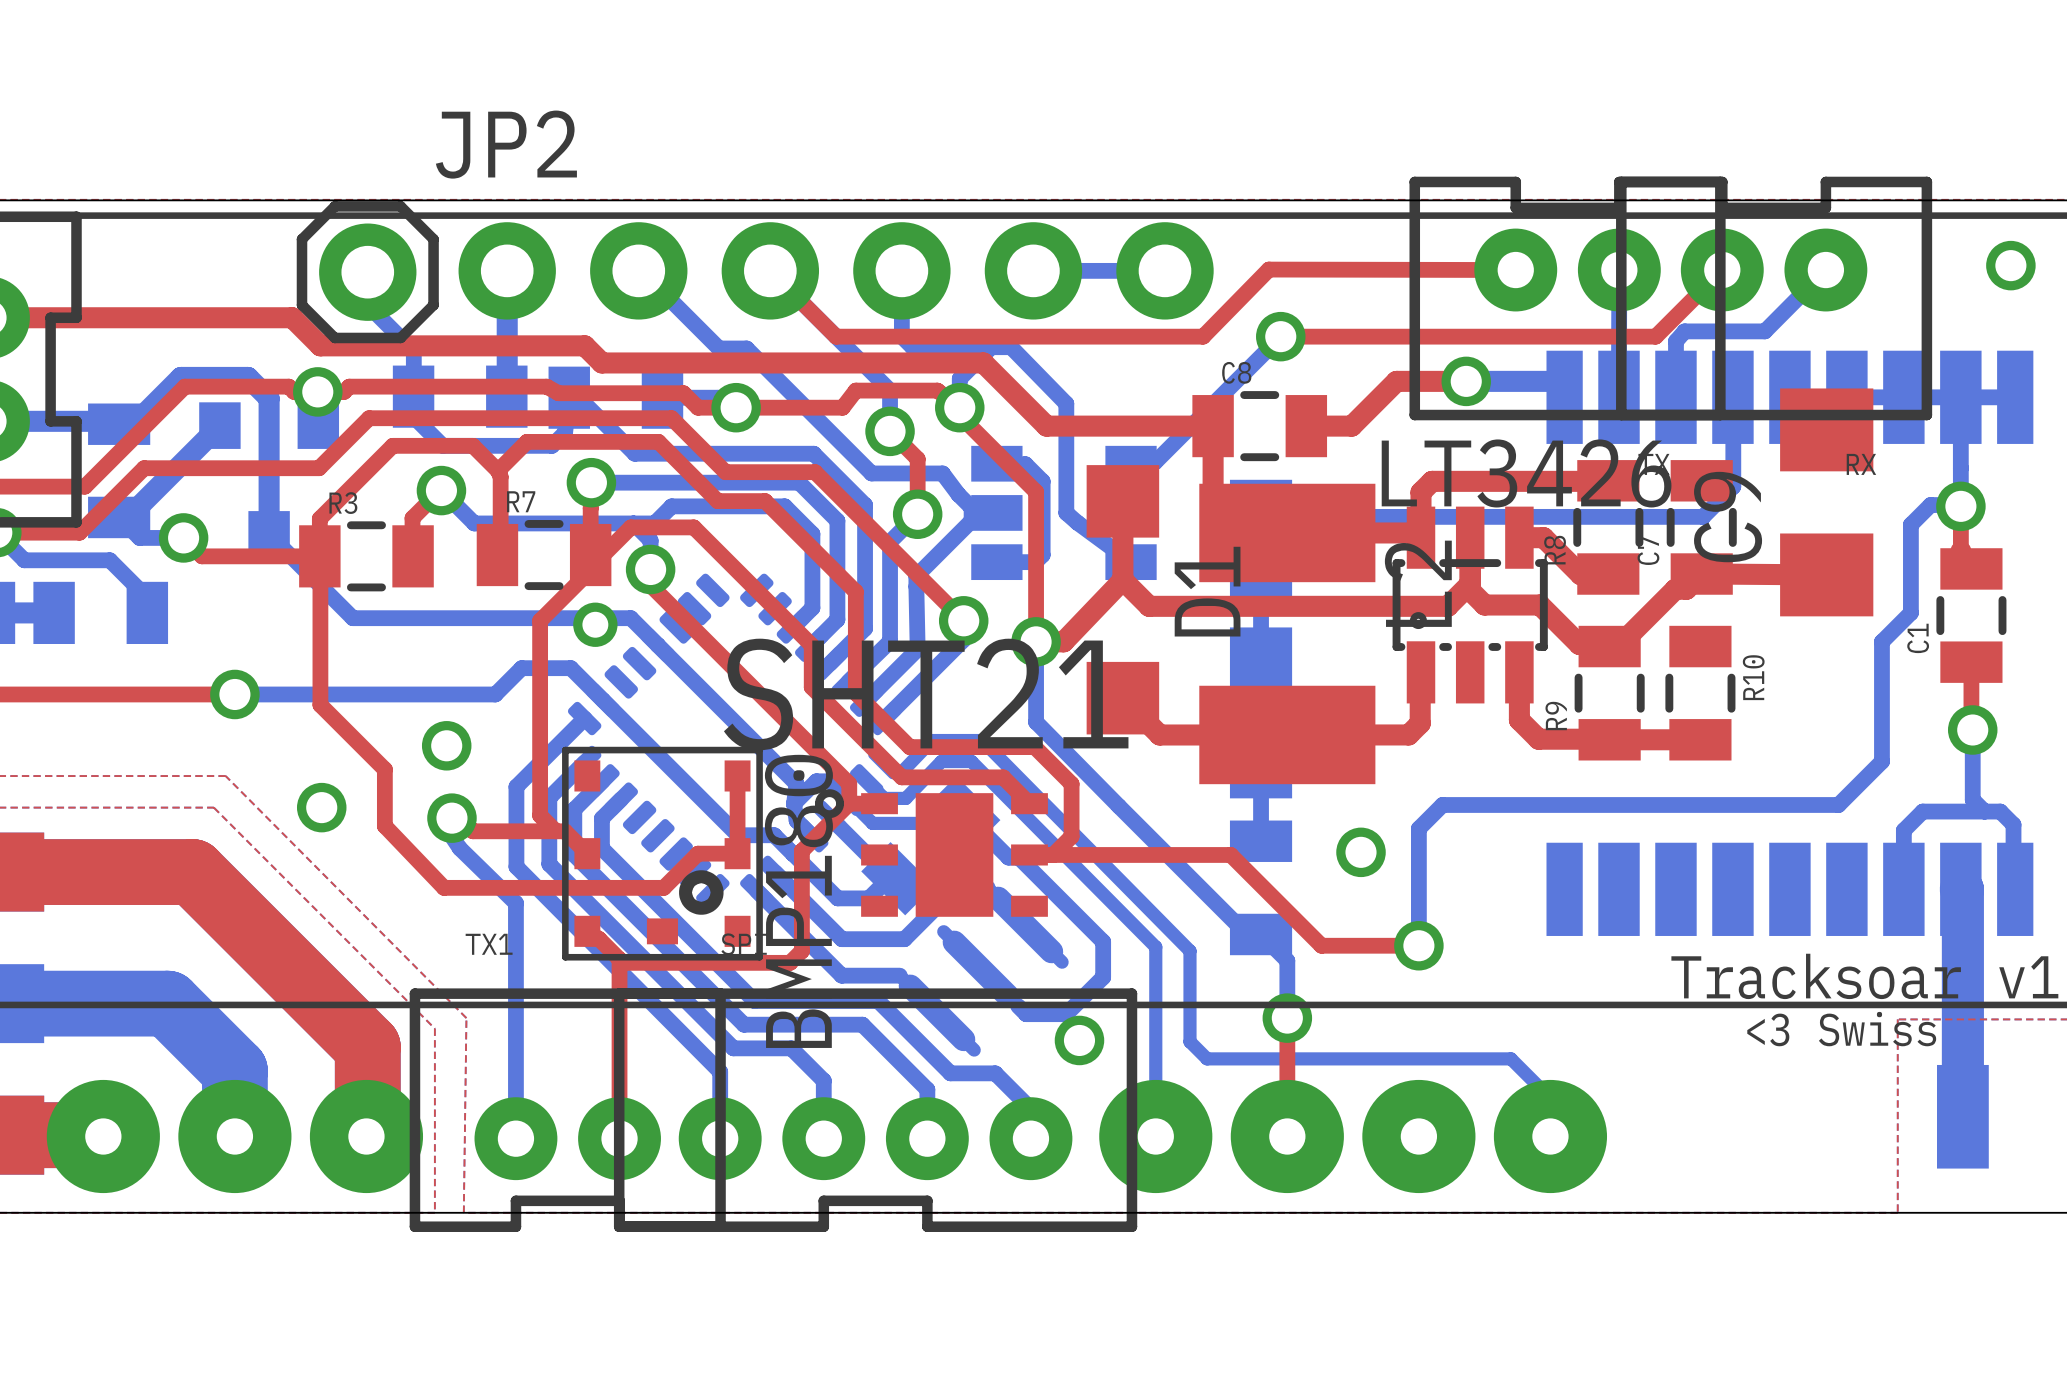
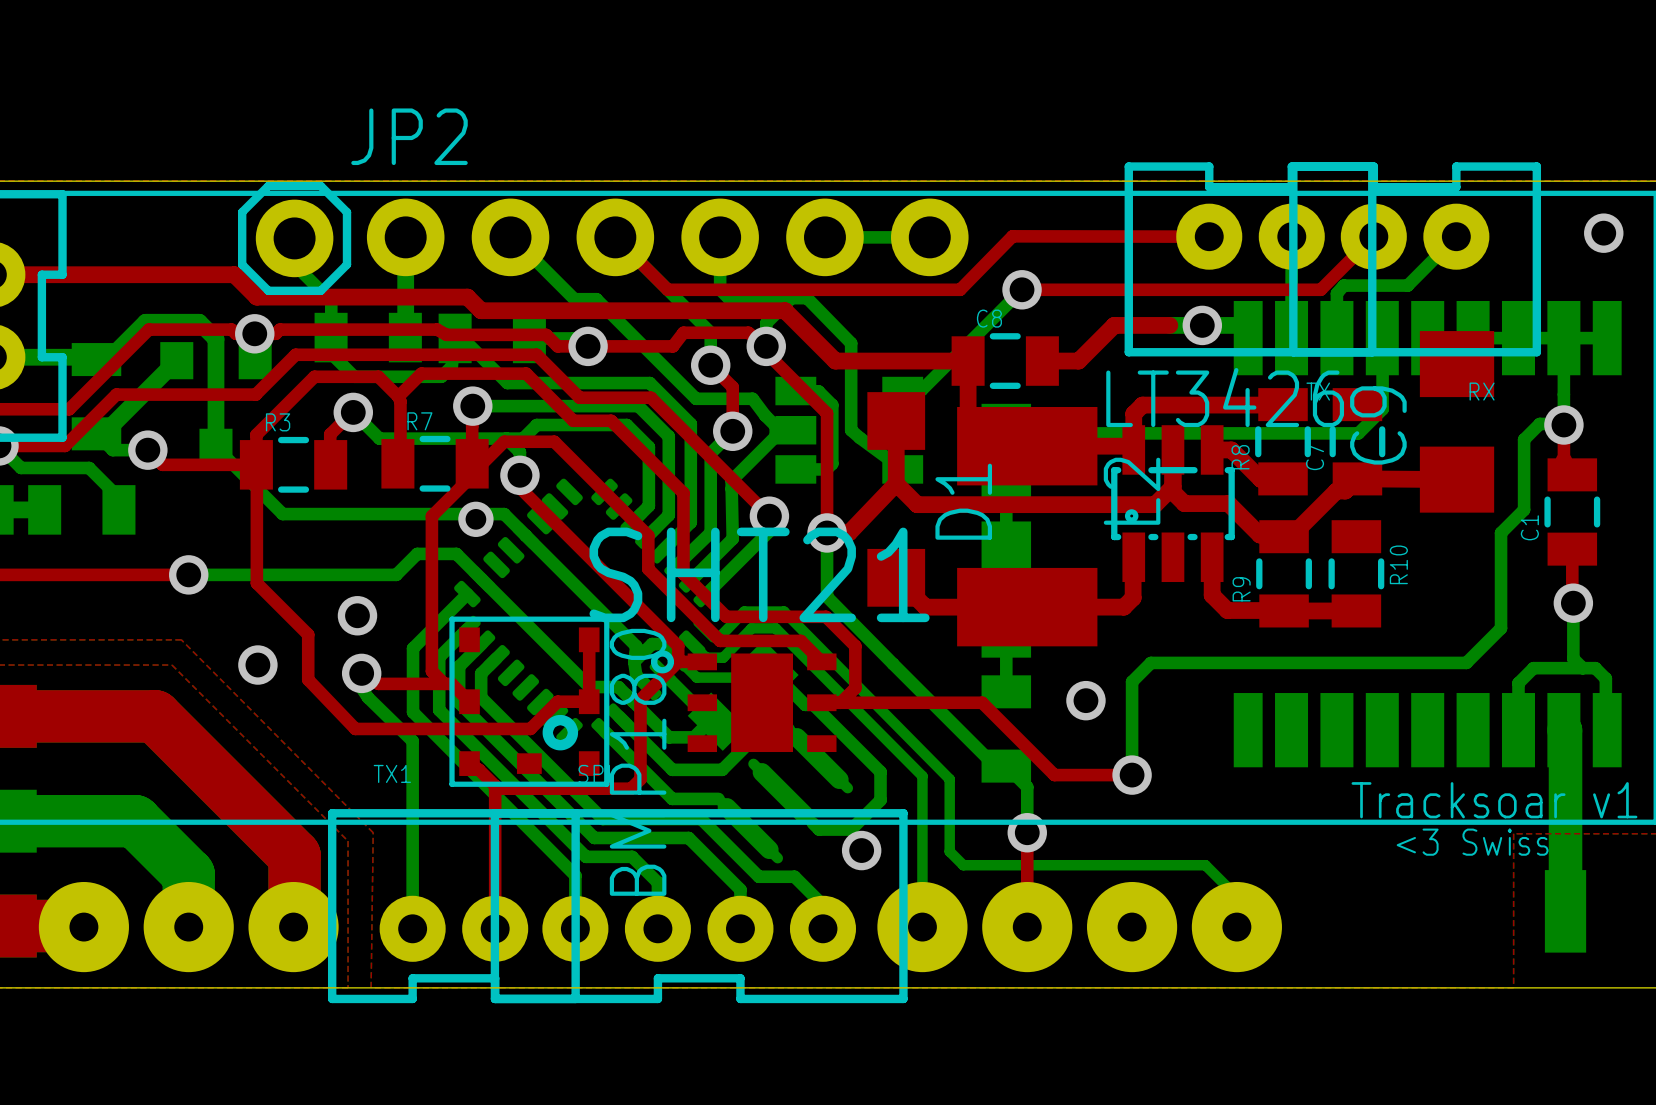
via position: (1466, 381) -> (1202, 325)

